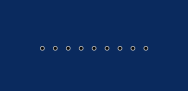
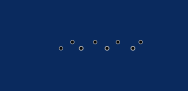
via: none -> (72, 42)
via: none -> (95, 42)
via: none -> (117, 42)
via: none -> (140, 42)
via: (42, 48) -> none
via: (55, 48) -> none
via: none -> (60, 48)
via: (68, 48) -> none
via: (94, 48) -> none
via: (119, 48) -> none
via: (145, 48) -> none

